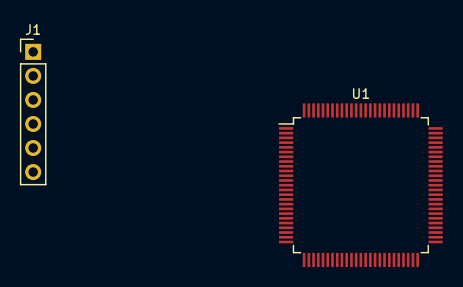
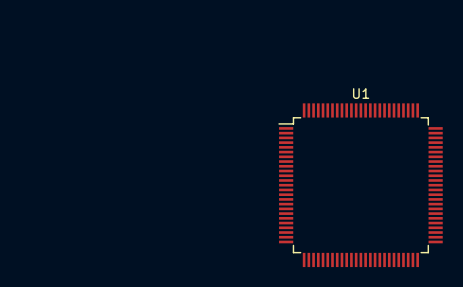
J1: (33, 111) -> none

